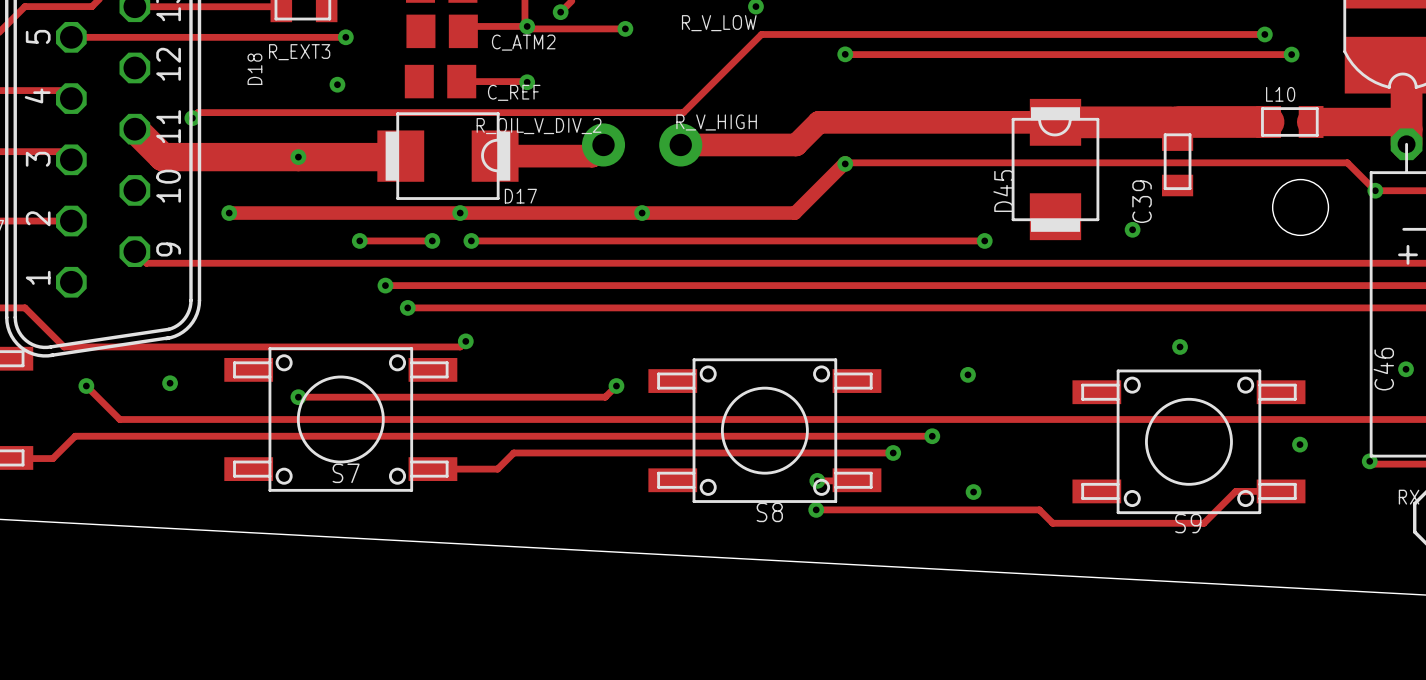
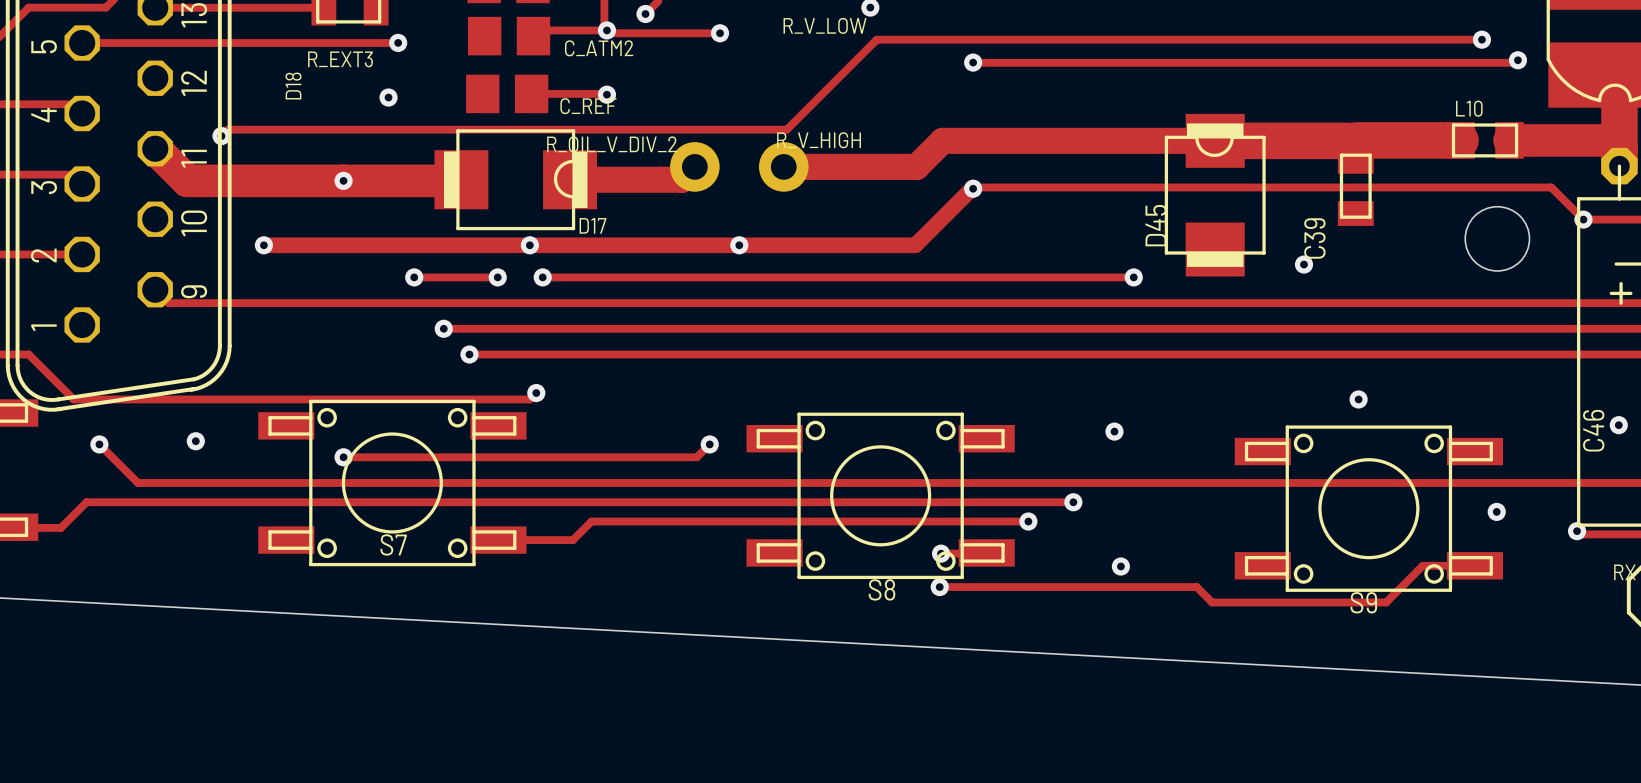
track: none -> (1456, 39) (1481, 39)
via: (1264, 34) -> none
via: none -> (1481, 39)
track: none -> (1517, 60) (1515, 62) (1487, 62)
via: none -> (1517, 60)
via: (1291, 54) -> none

